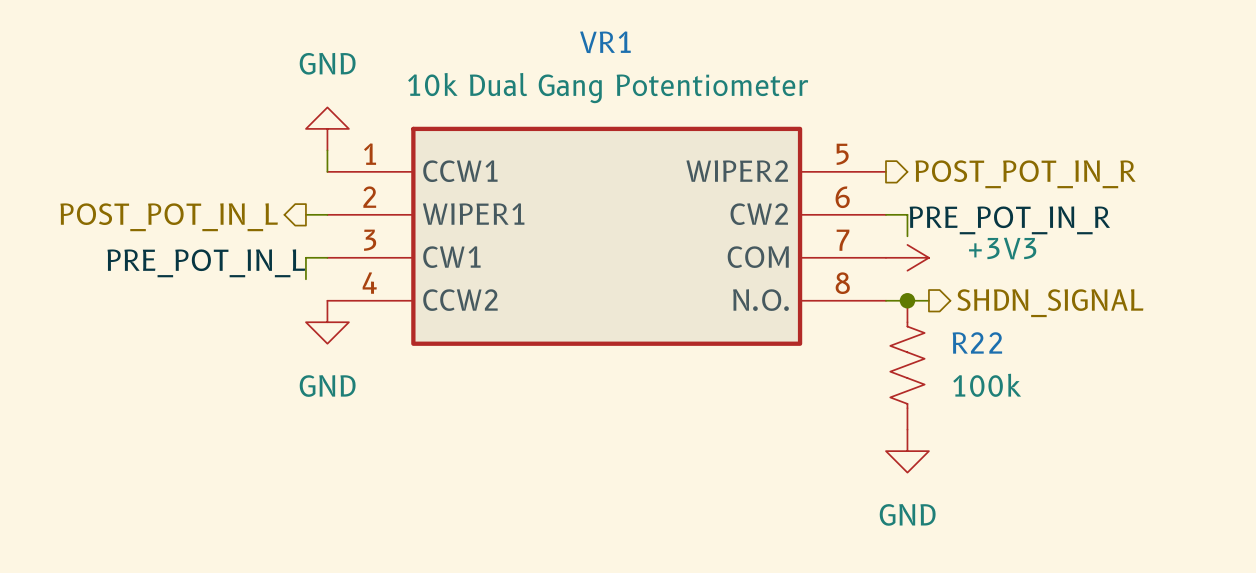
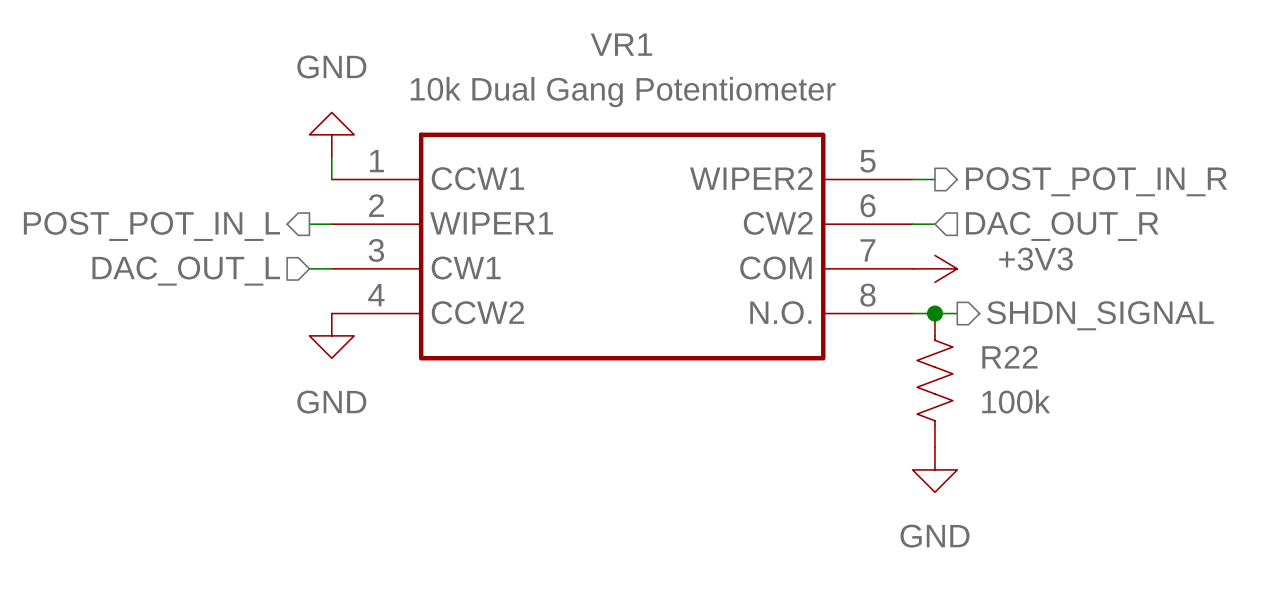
wire: none -> (912, 179) (934, 179)
hierarchical label position: POST_POT_IN_R (1025, 174) -> POST_POT_IN_R (1096, 181)
wire: (907, 214) (907, 236) -> none
hierarchical label: none -> DAC_OUT_R (1062, 226)
label: PRE_POT_IN_R (1009, 220) -> none
wire: (305, 257) (305, 279) -> none
hierarchical label: none -> DAC_OUT_L (186, 271)
label: PRE_POT_IN_L (206, 263) -> none

